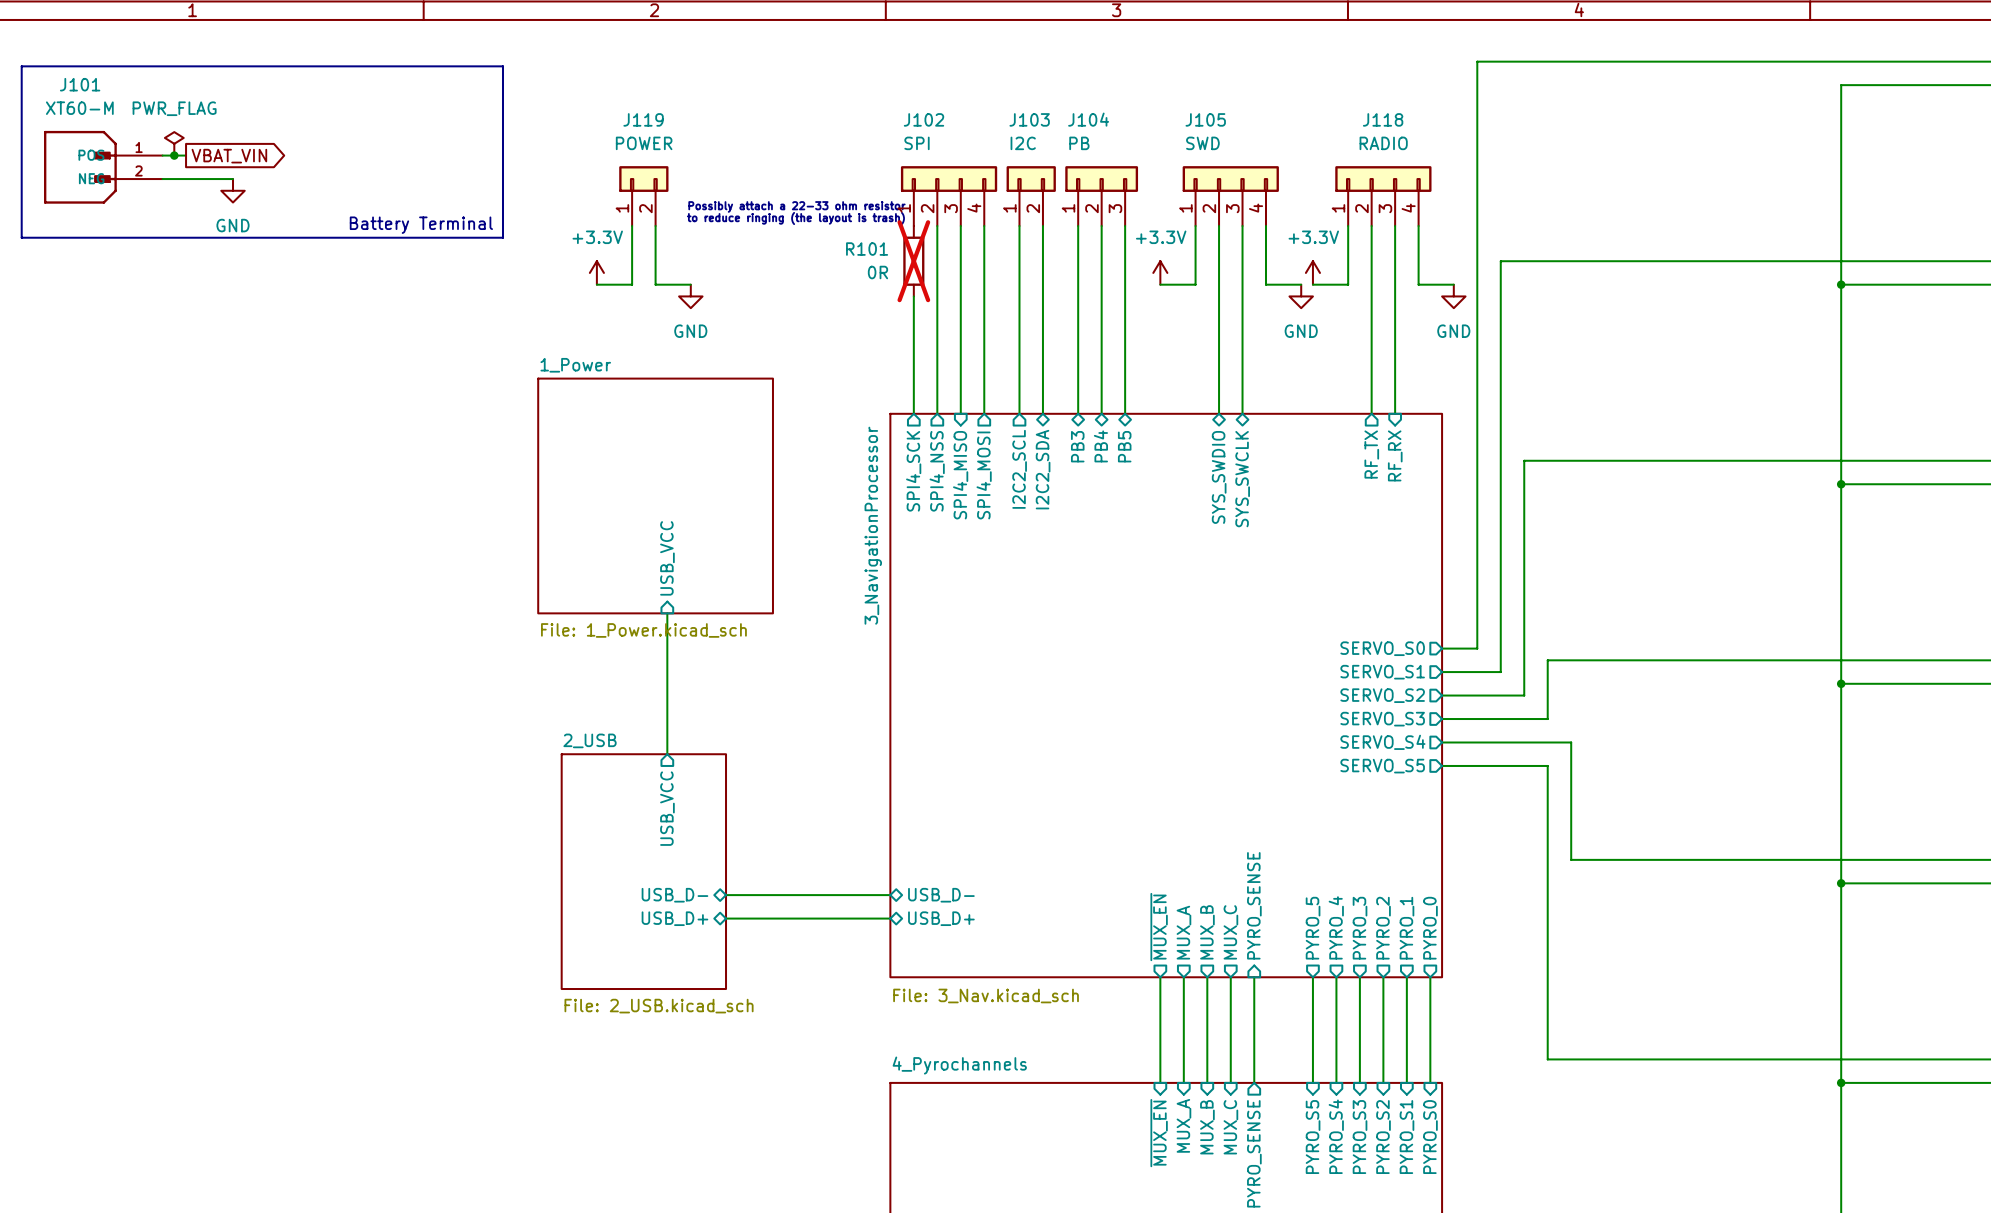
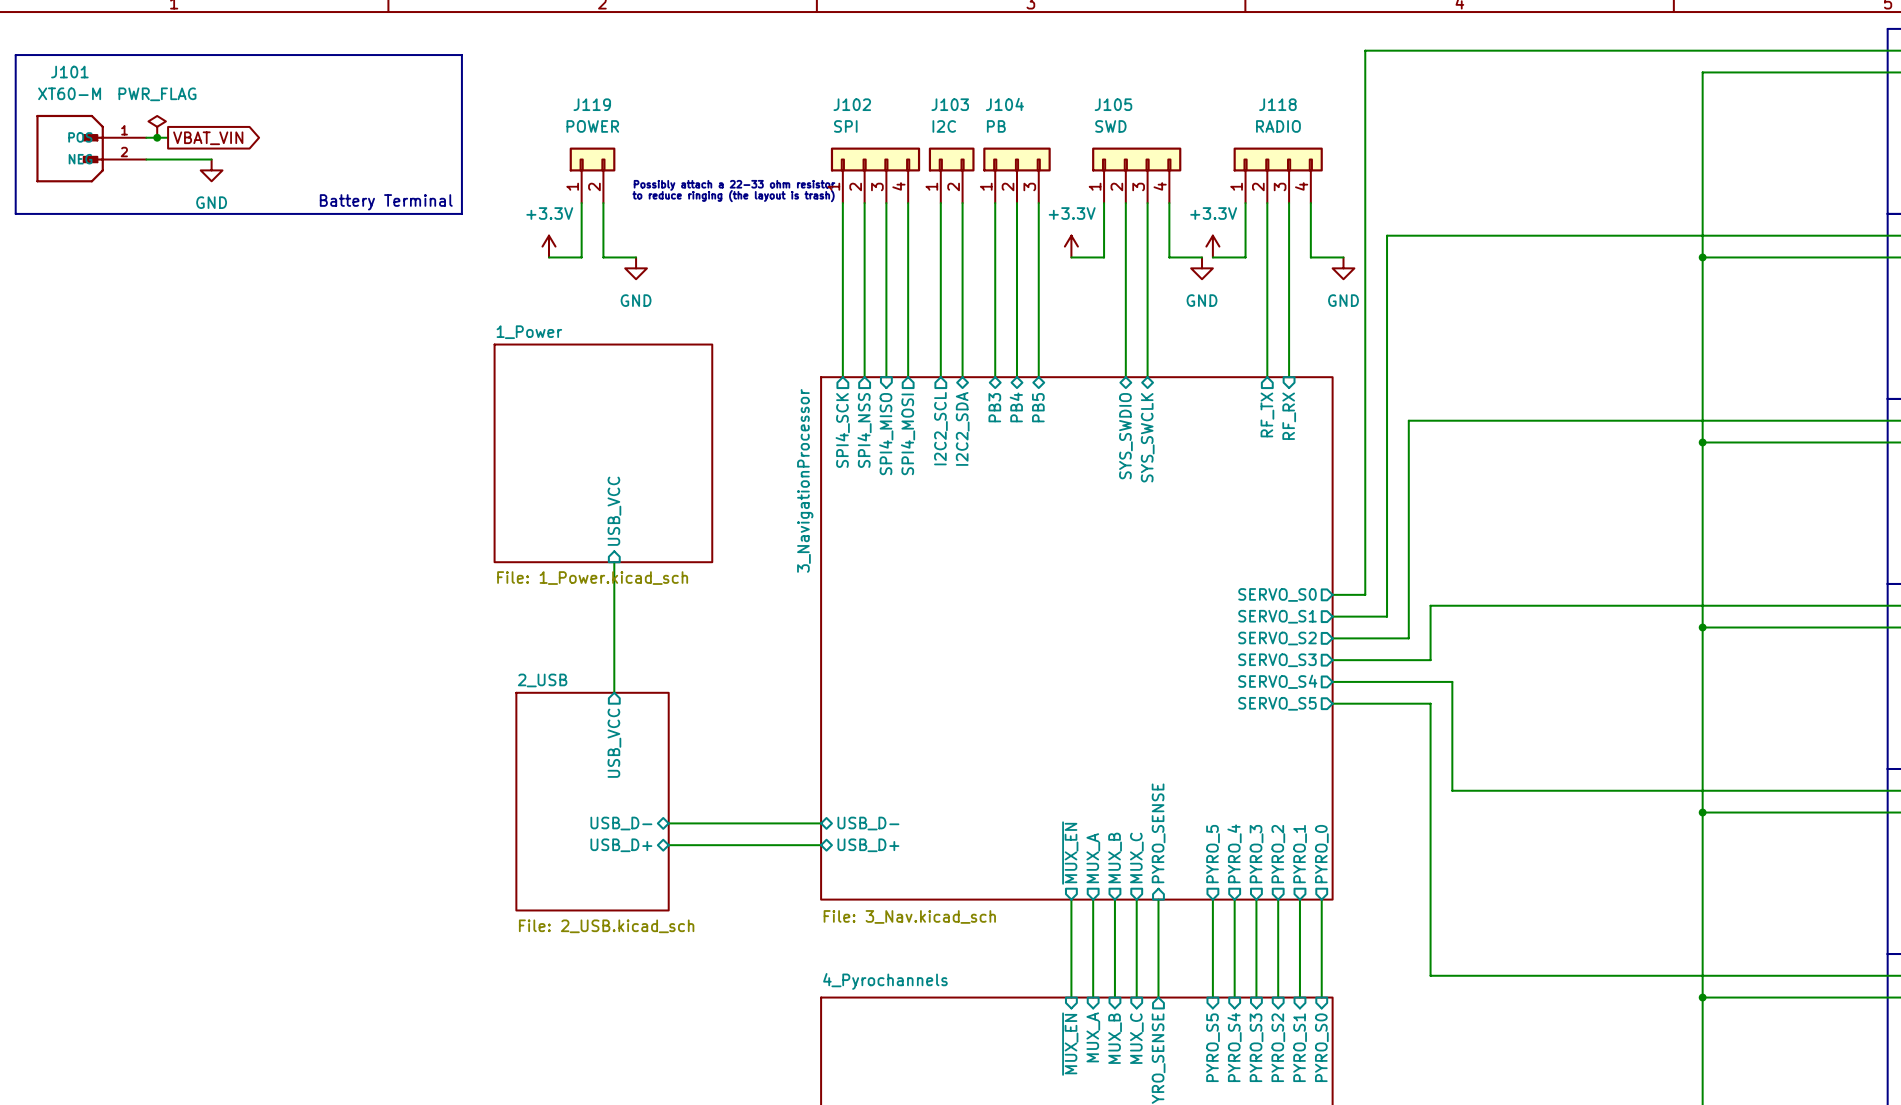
R101: 0R (913, 261) -> none

